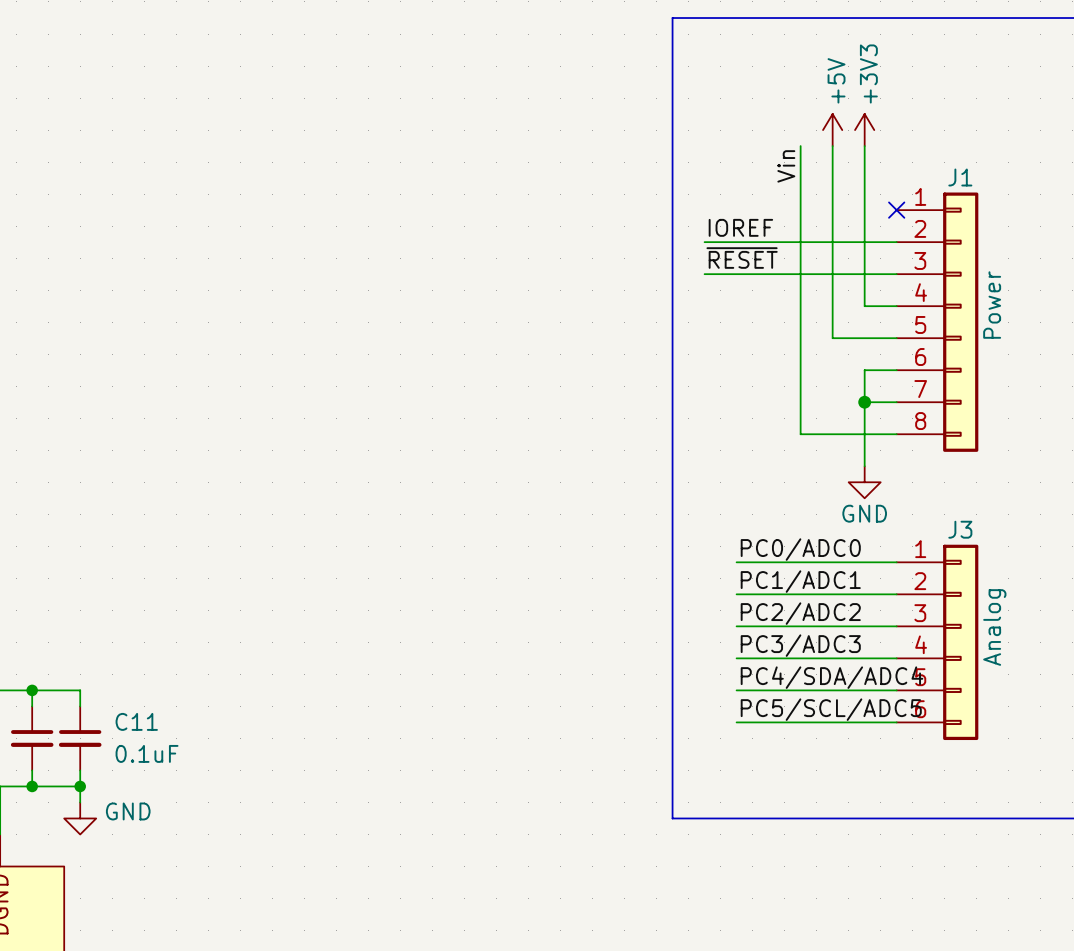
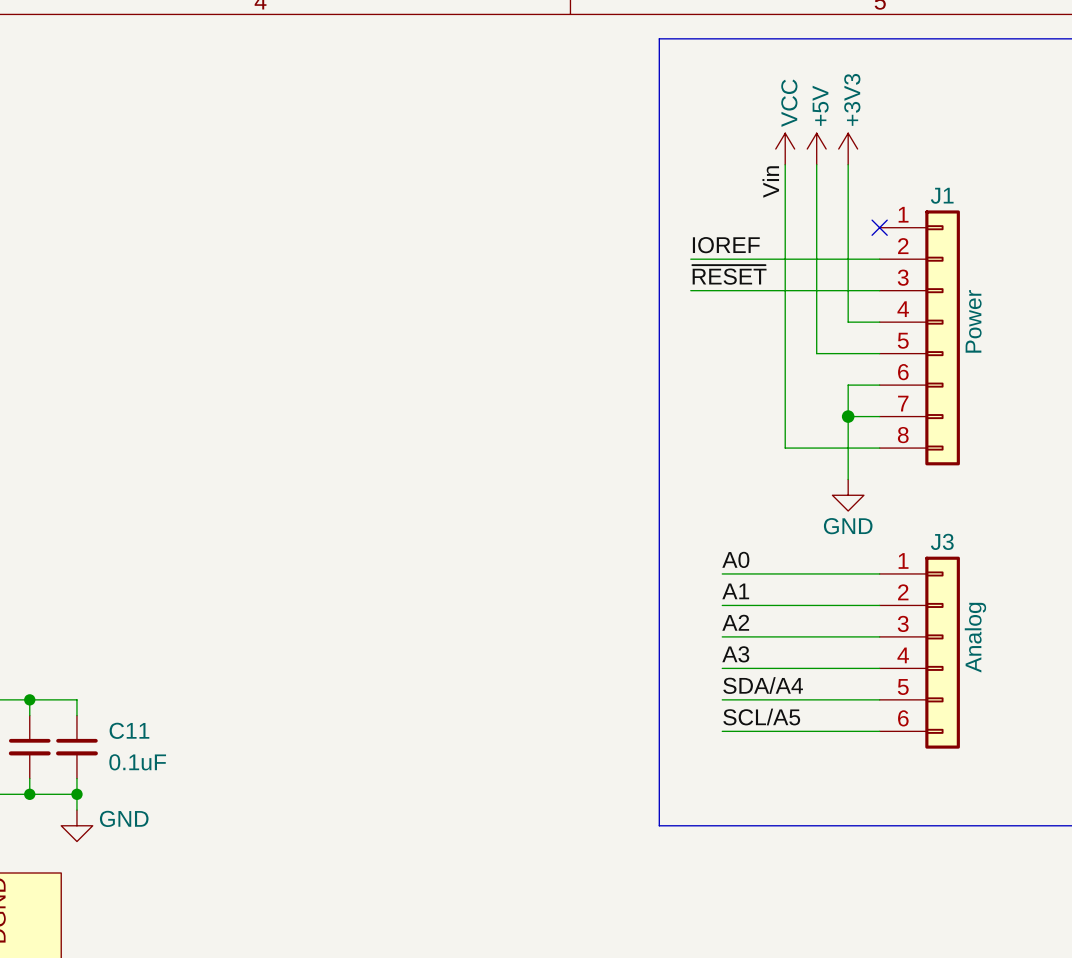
power symbol: none -> VCC (785, 149)
label: PC0/ADC0 (800, 549) -> A0 (735, 559)
label: PC1/ADC1 (800, 581) -> A1 (735, 591)
label: PC2/ADC2 (800, 613) -> A2 (735, 622)
label: PC3/ADC3 (800, 645) -> A3 (735, 654)
label: PC4/SDA/ADC4 (832, 677) -> SDA/A4 (763, 685)
label: PC5/SCL/ADC5 (831, 709) -> SCL/A5 (761, 717)

